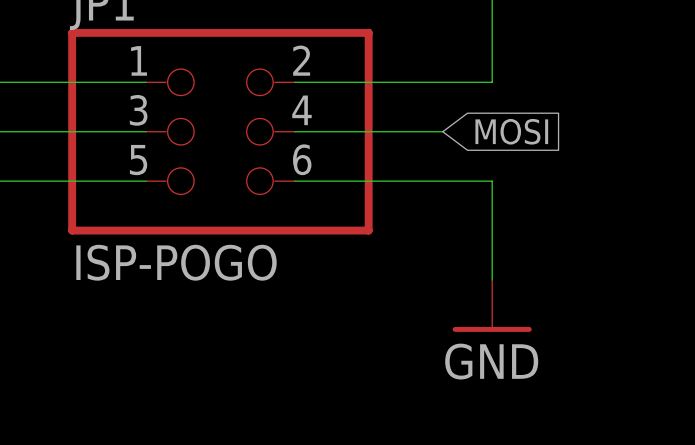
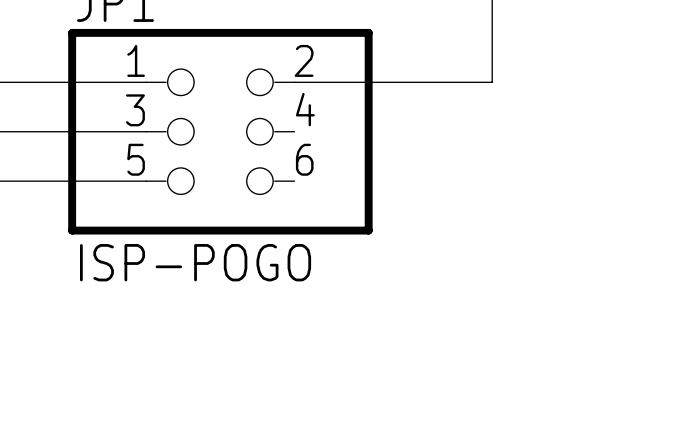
wire: (294, 131) (442, 131) -> none
global label: MOSI (511, 131) -> none
wire: (294, 181) (492, 181) (492, 279) -> none
power symbol: GND (492, 305) -> none

